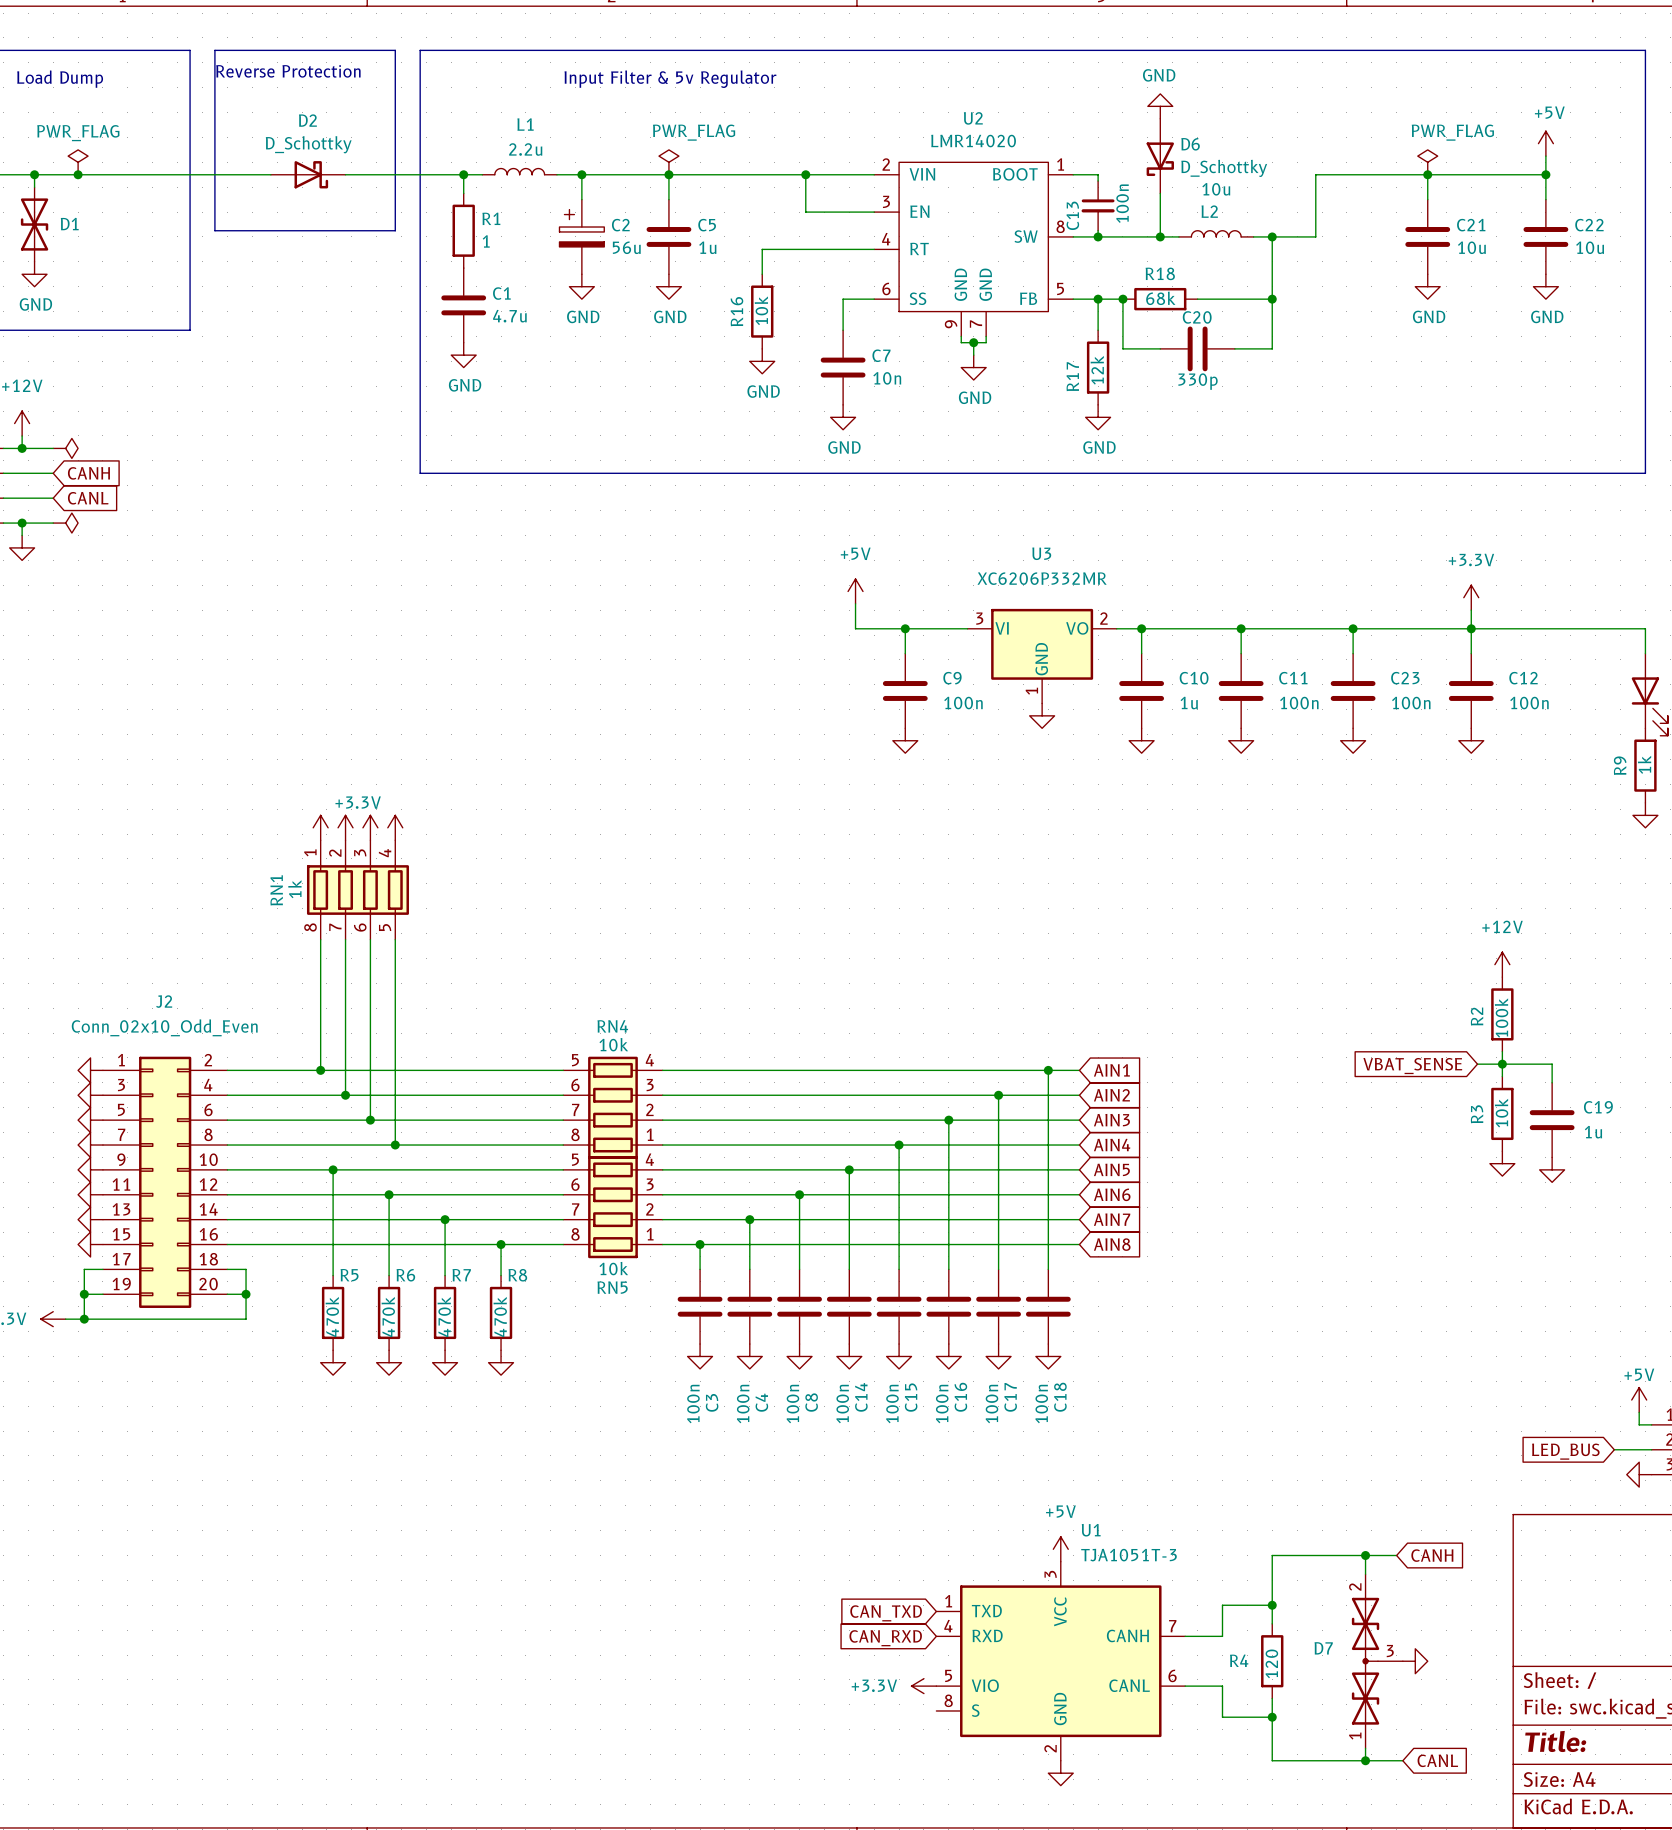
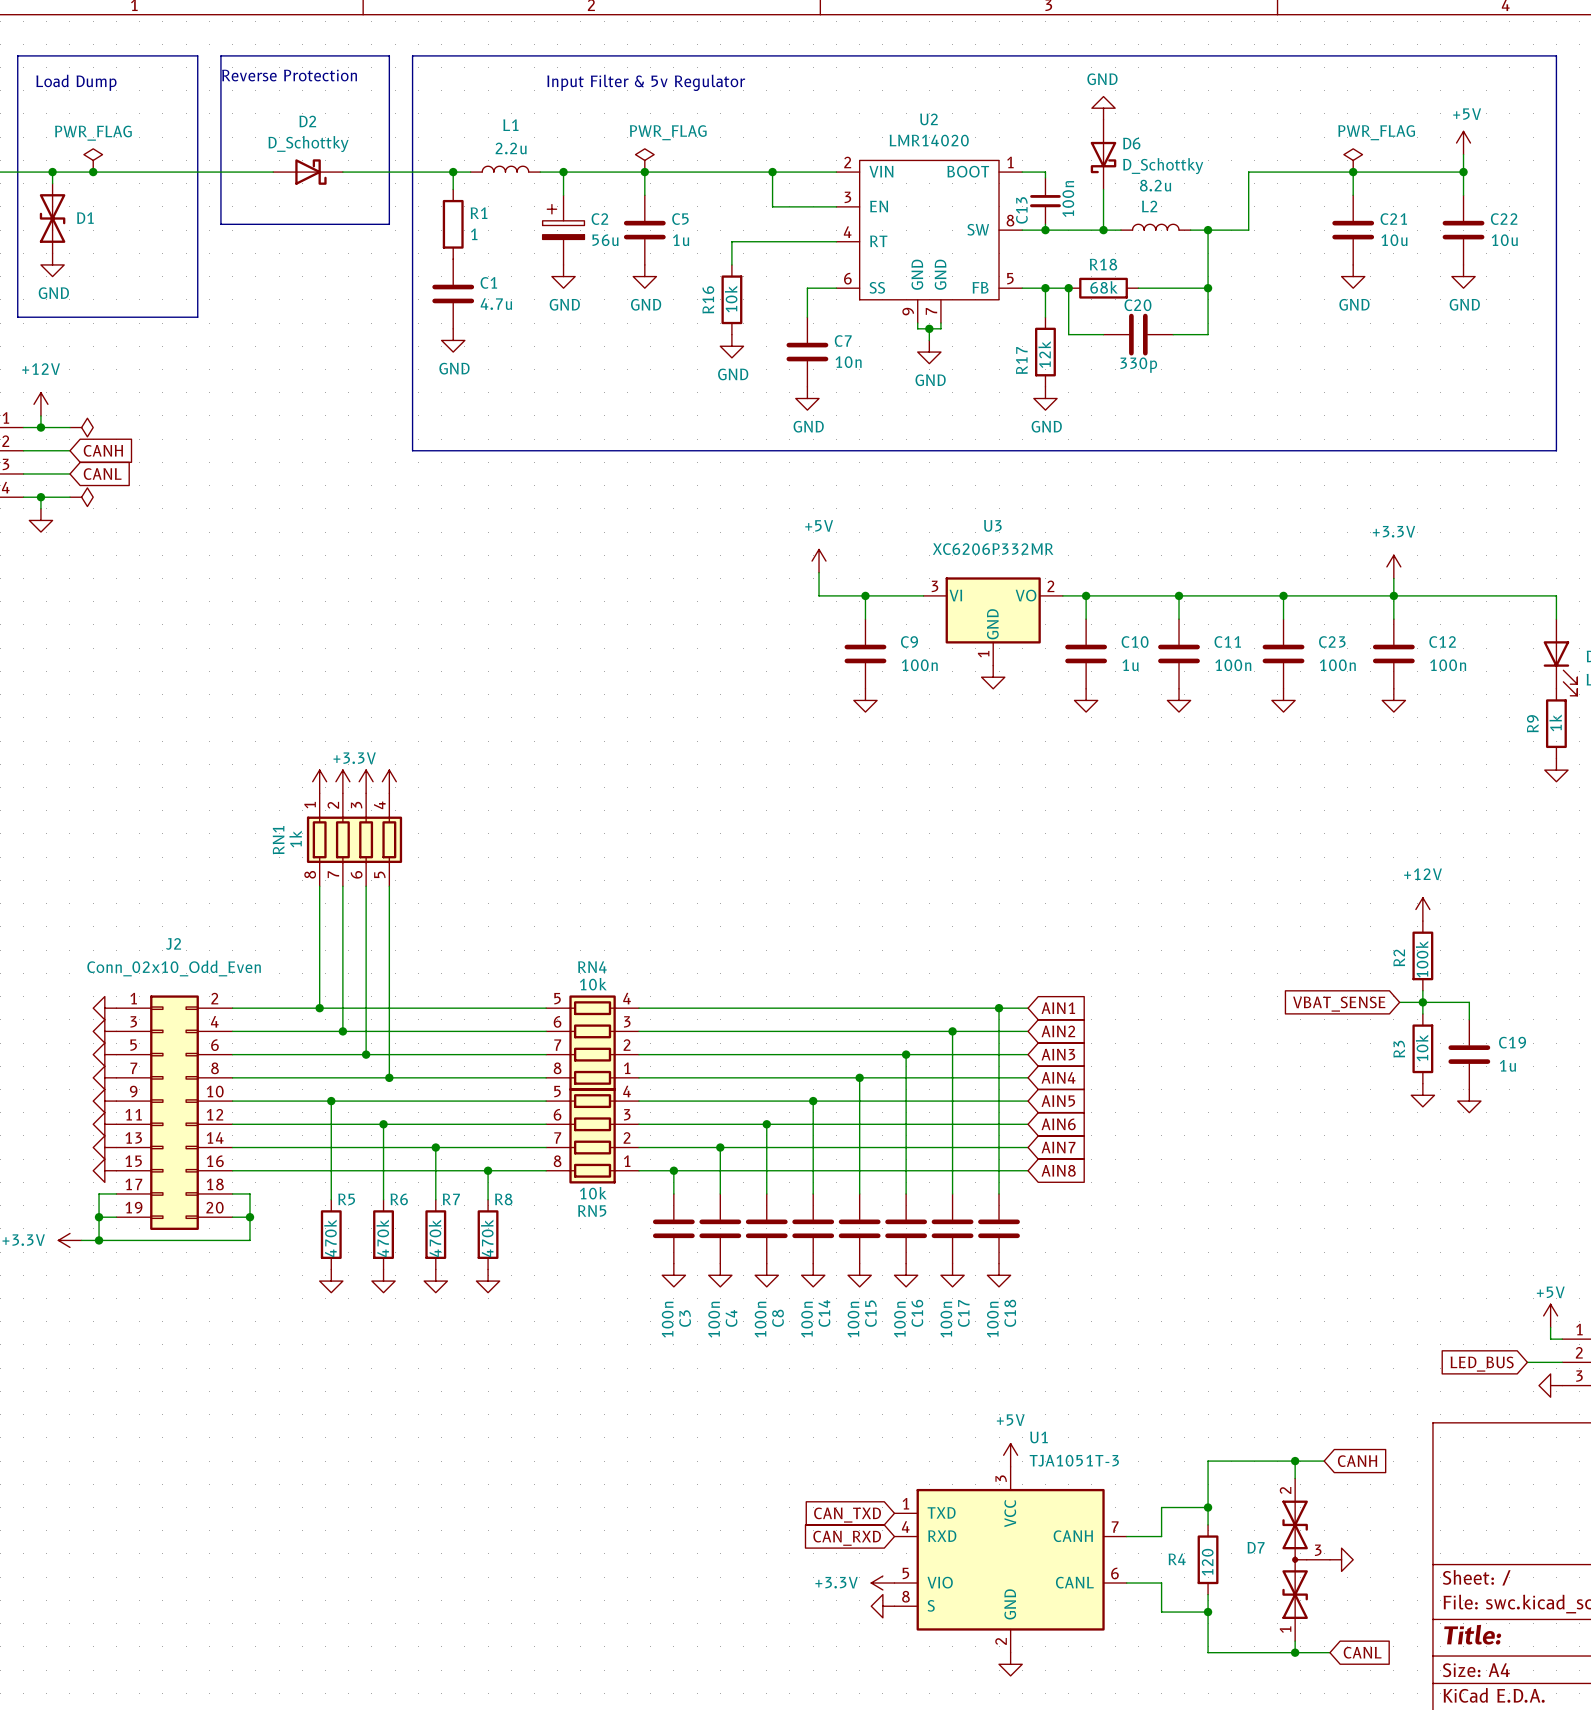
L2 value: 10u (1216, 189) -> 8.2u (1155, 185)
power symbol: none -> (882, 1606)

